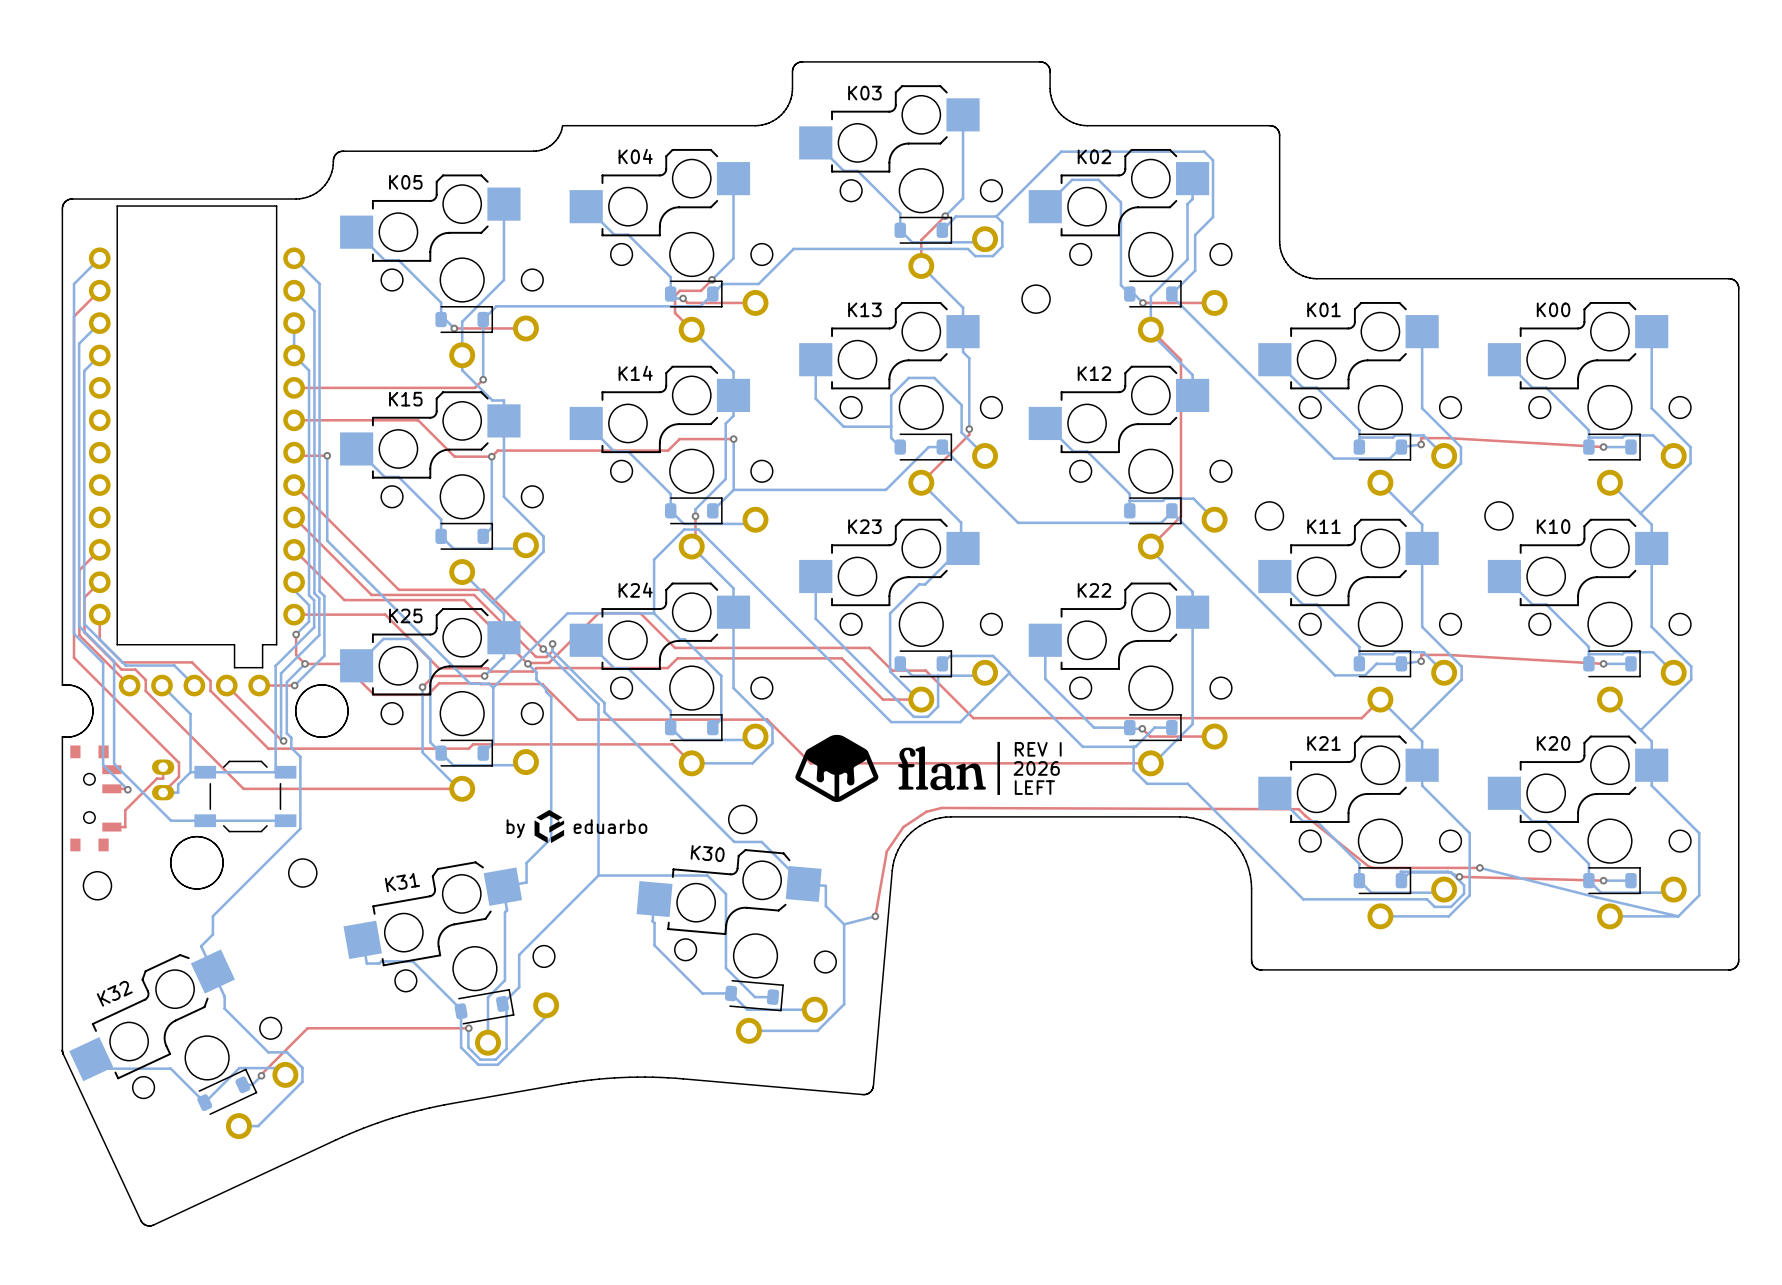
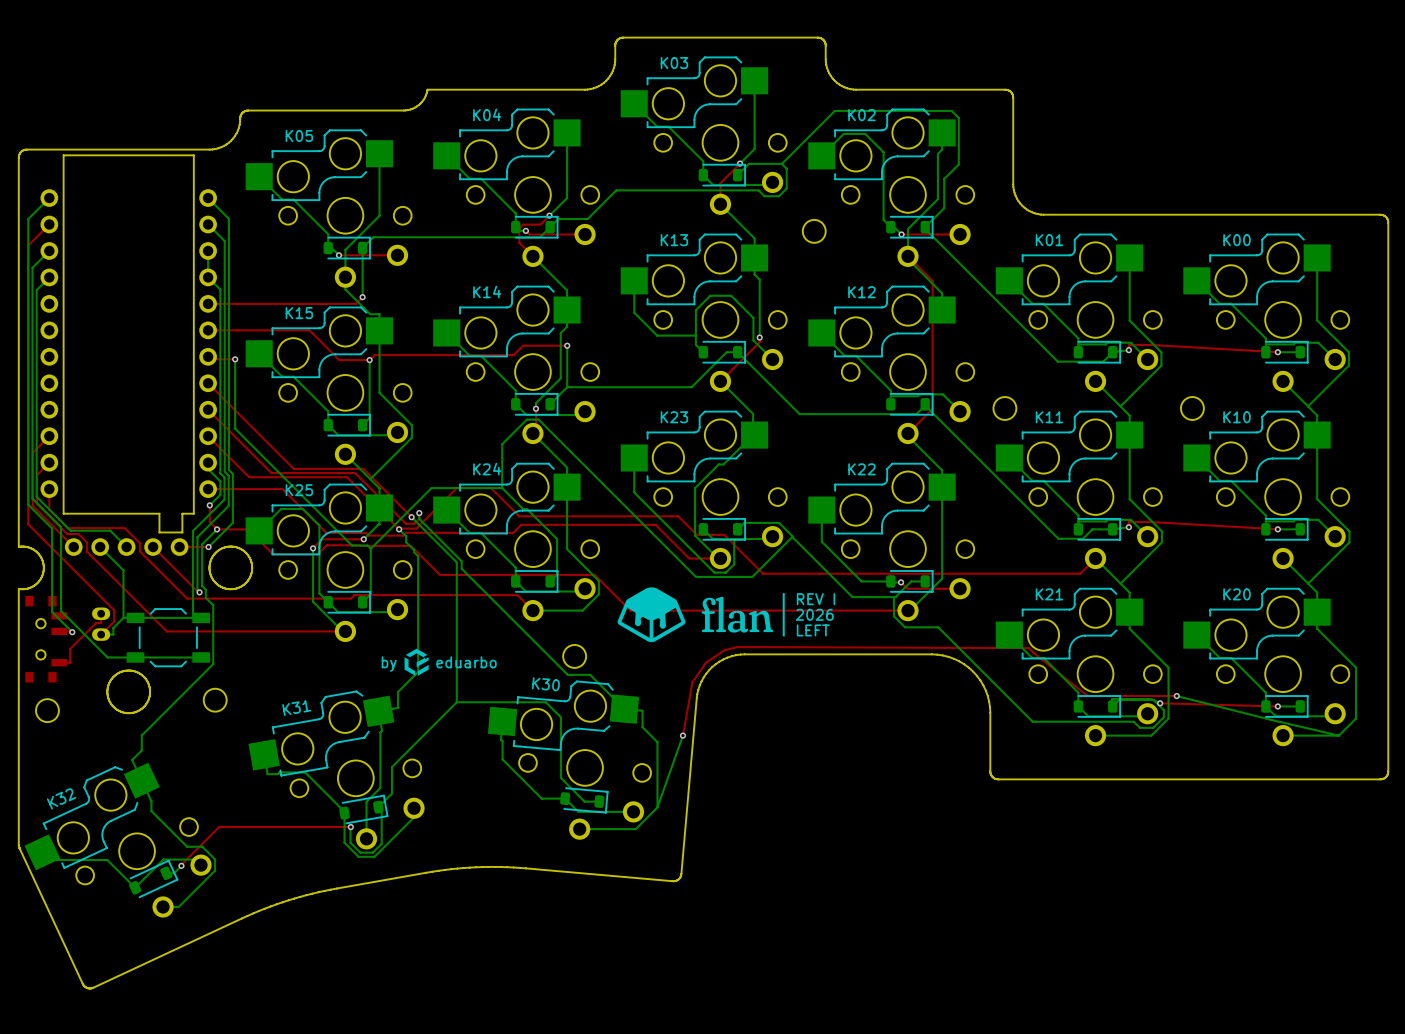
bottom track: (875, 916) (844, 924) -> (682, 735) (657, 807)

